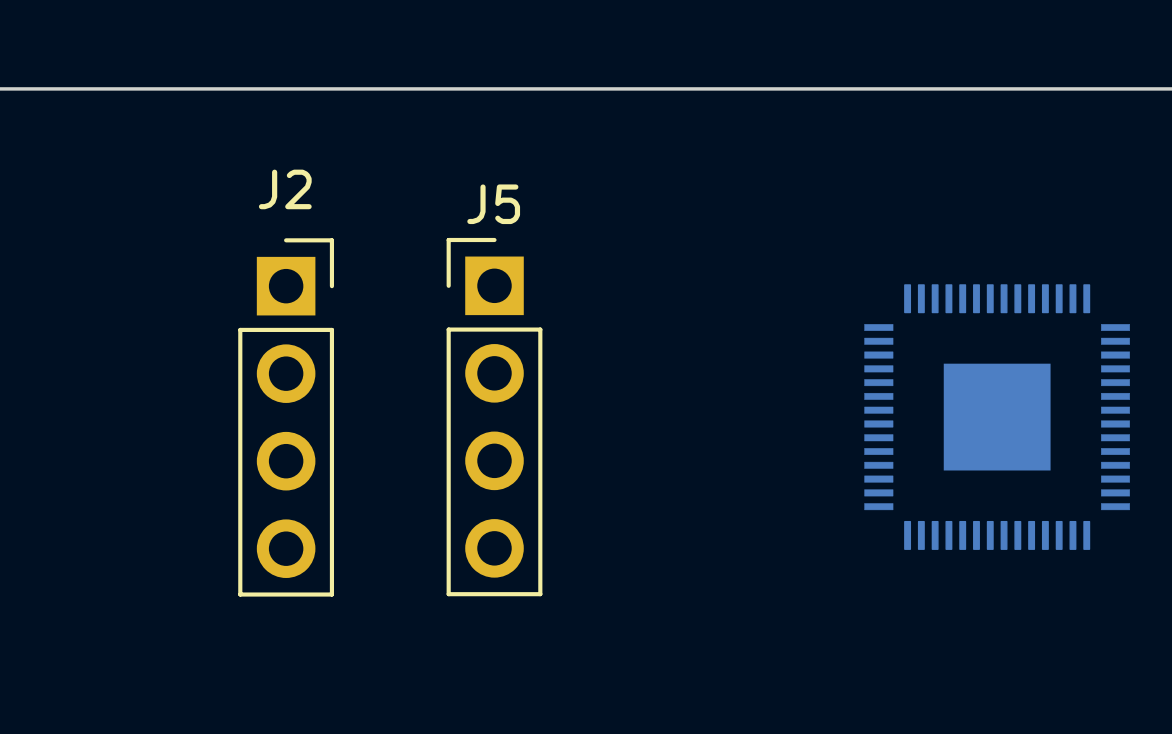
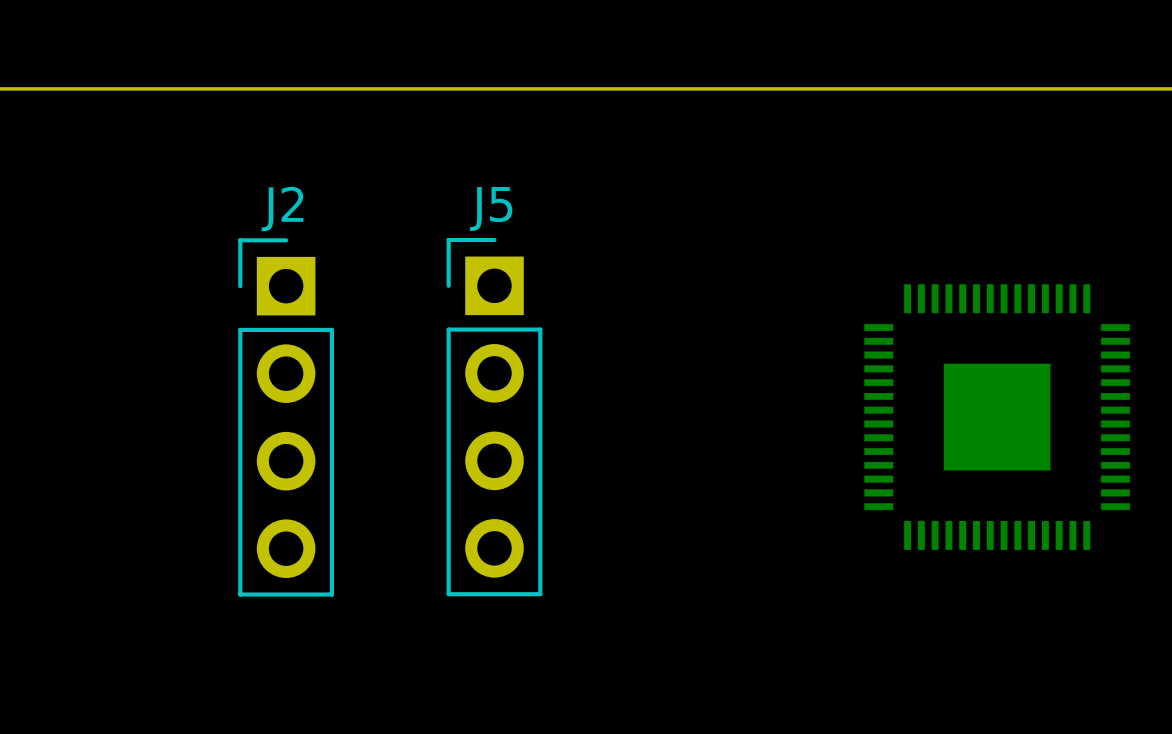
J2 footprint: [238, 238, 335, 597] -> [238, 238, 335, 597]

